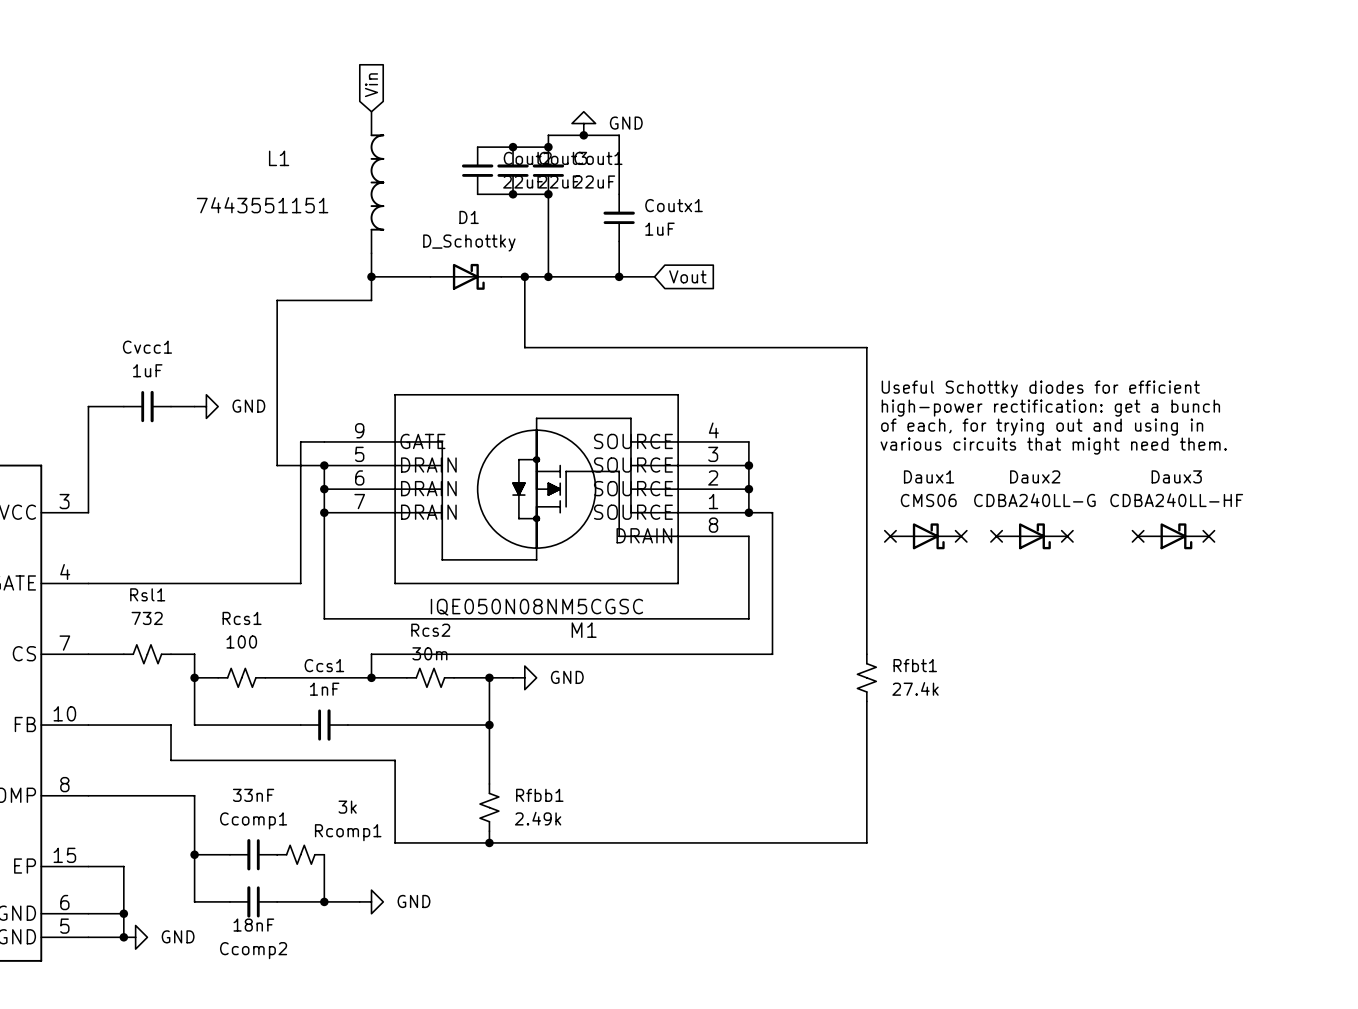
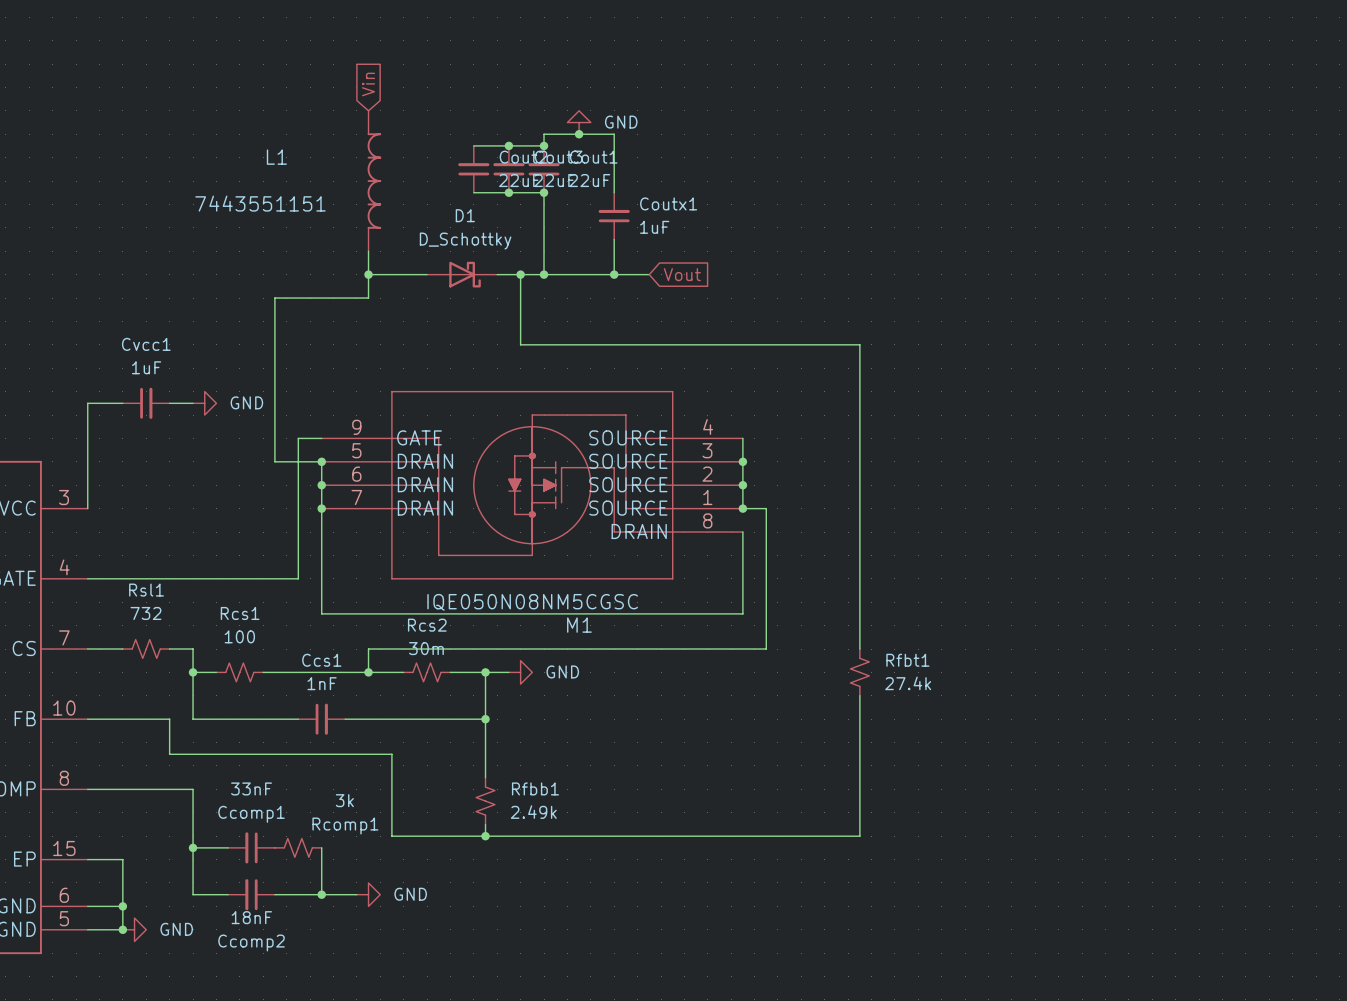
text: Useful Schottky diodes for efficient (1040, 389) -> none
text: high-power rectification: get a bunch (1050, 408) -> none
text: of each, for trying out and using in (1042, 427) -> none
text: various circuits that might need them. (1053, 446) -> none
no-connect mark: (890, 536) -> none
Daux1: CMS06 (925, 536) -> none
no-connect mark: (961, 536) -> none
no-connect mark: (996, 536) -> none
Daux2: CDBA240LL-G (1031, 536) -> none
no-connect mark: (1067, 536) -> none
no-connect mark: (1138, 536) -> none
Daux3: CDBA240LL-HF (1173, 536) -> none
no-connect mark: (1208, 536) -> none

